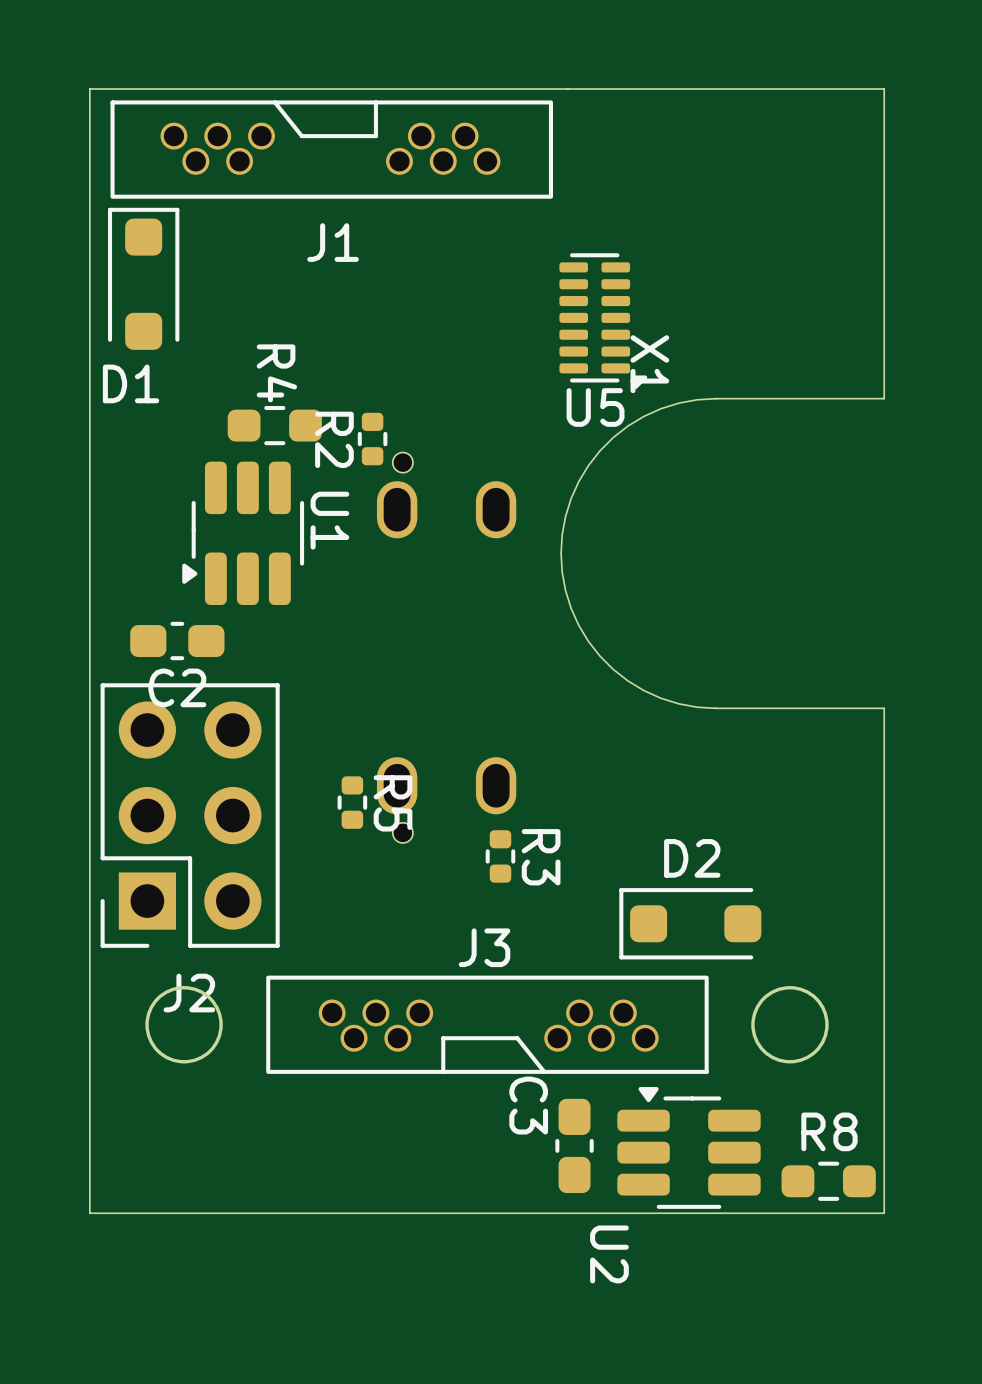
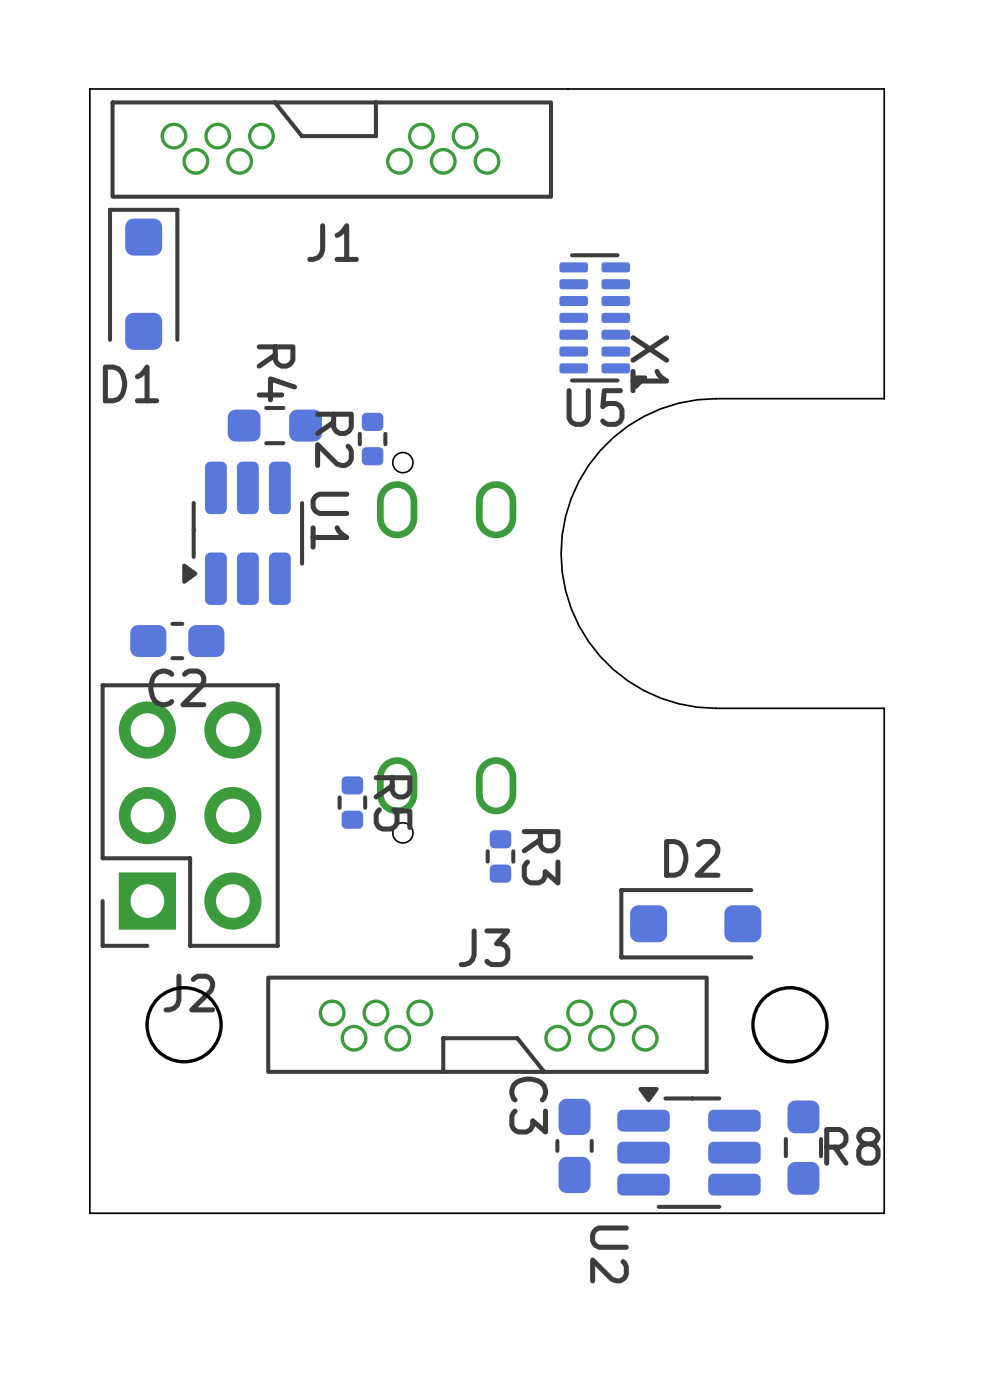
R8 rotation: 0° (828, 1181) -> 90° clockwise (803, 1147)

